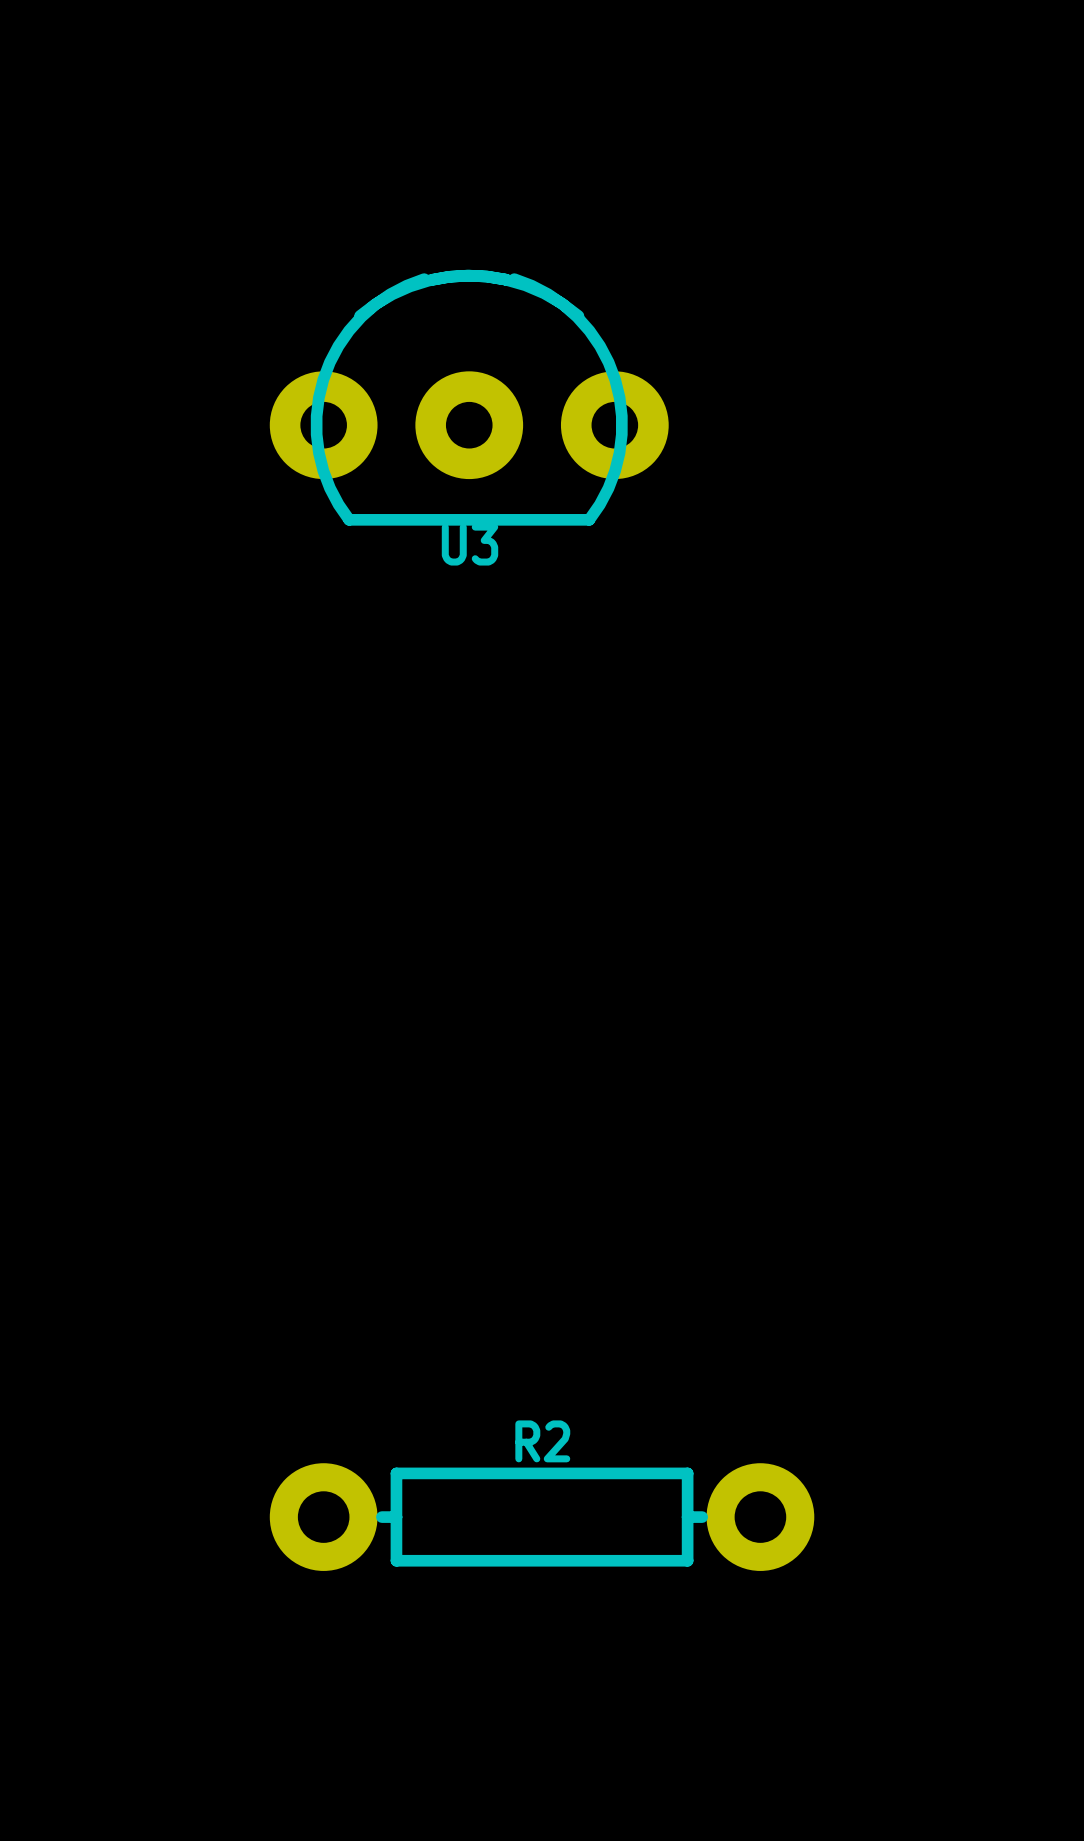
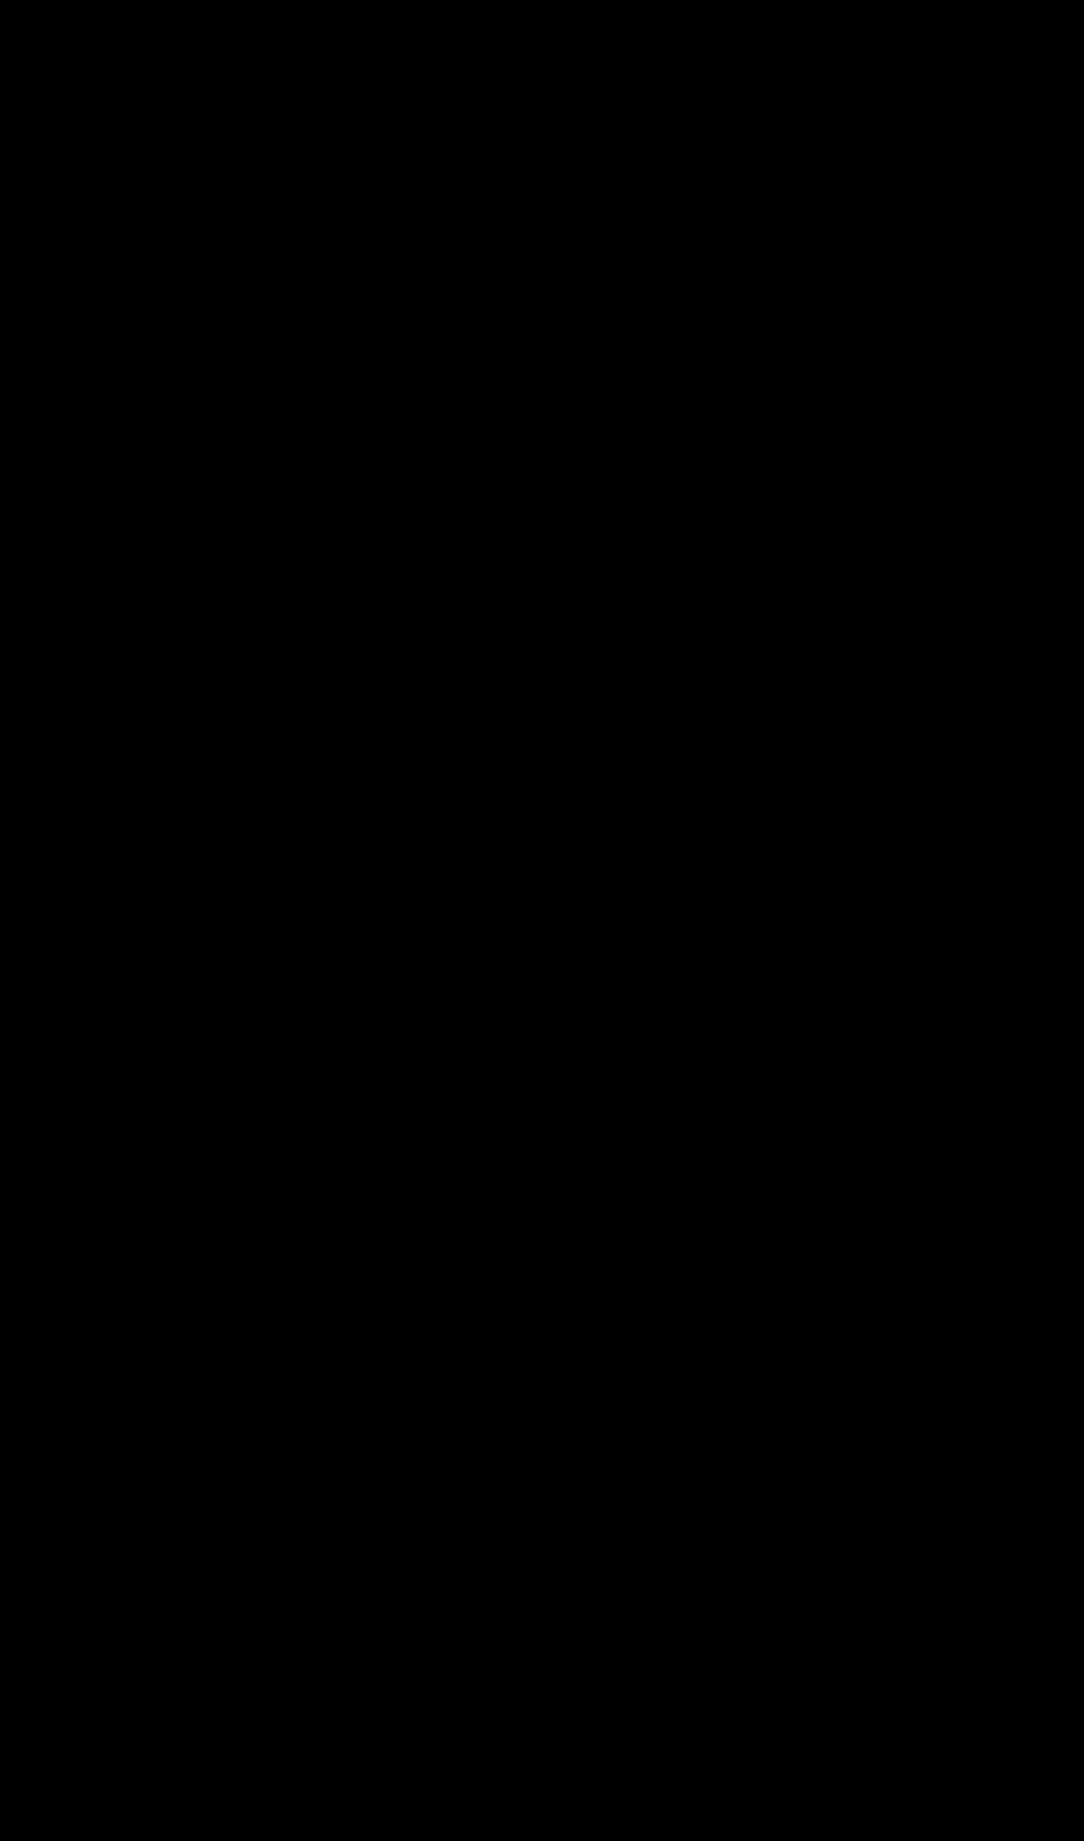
U3: (469, 397) -> none
R2: (542, 1517) -> none

